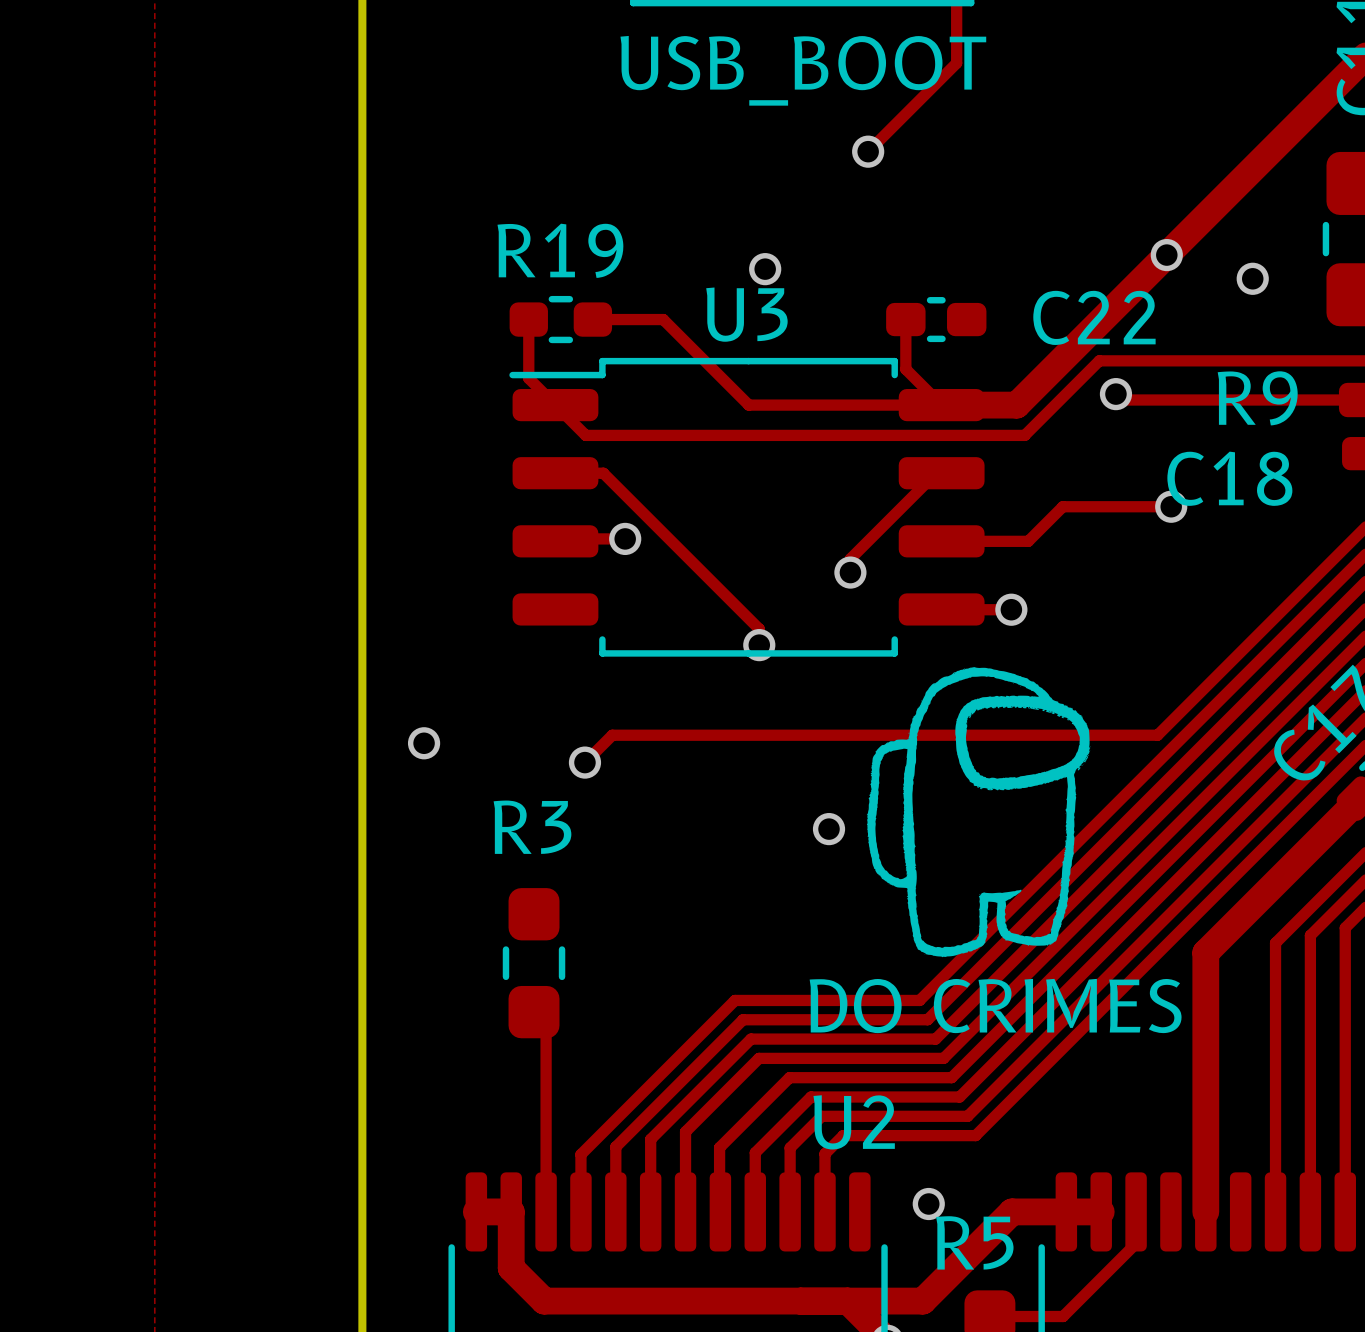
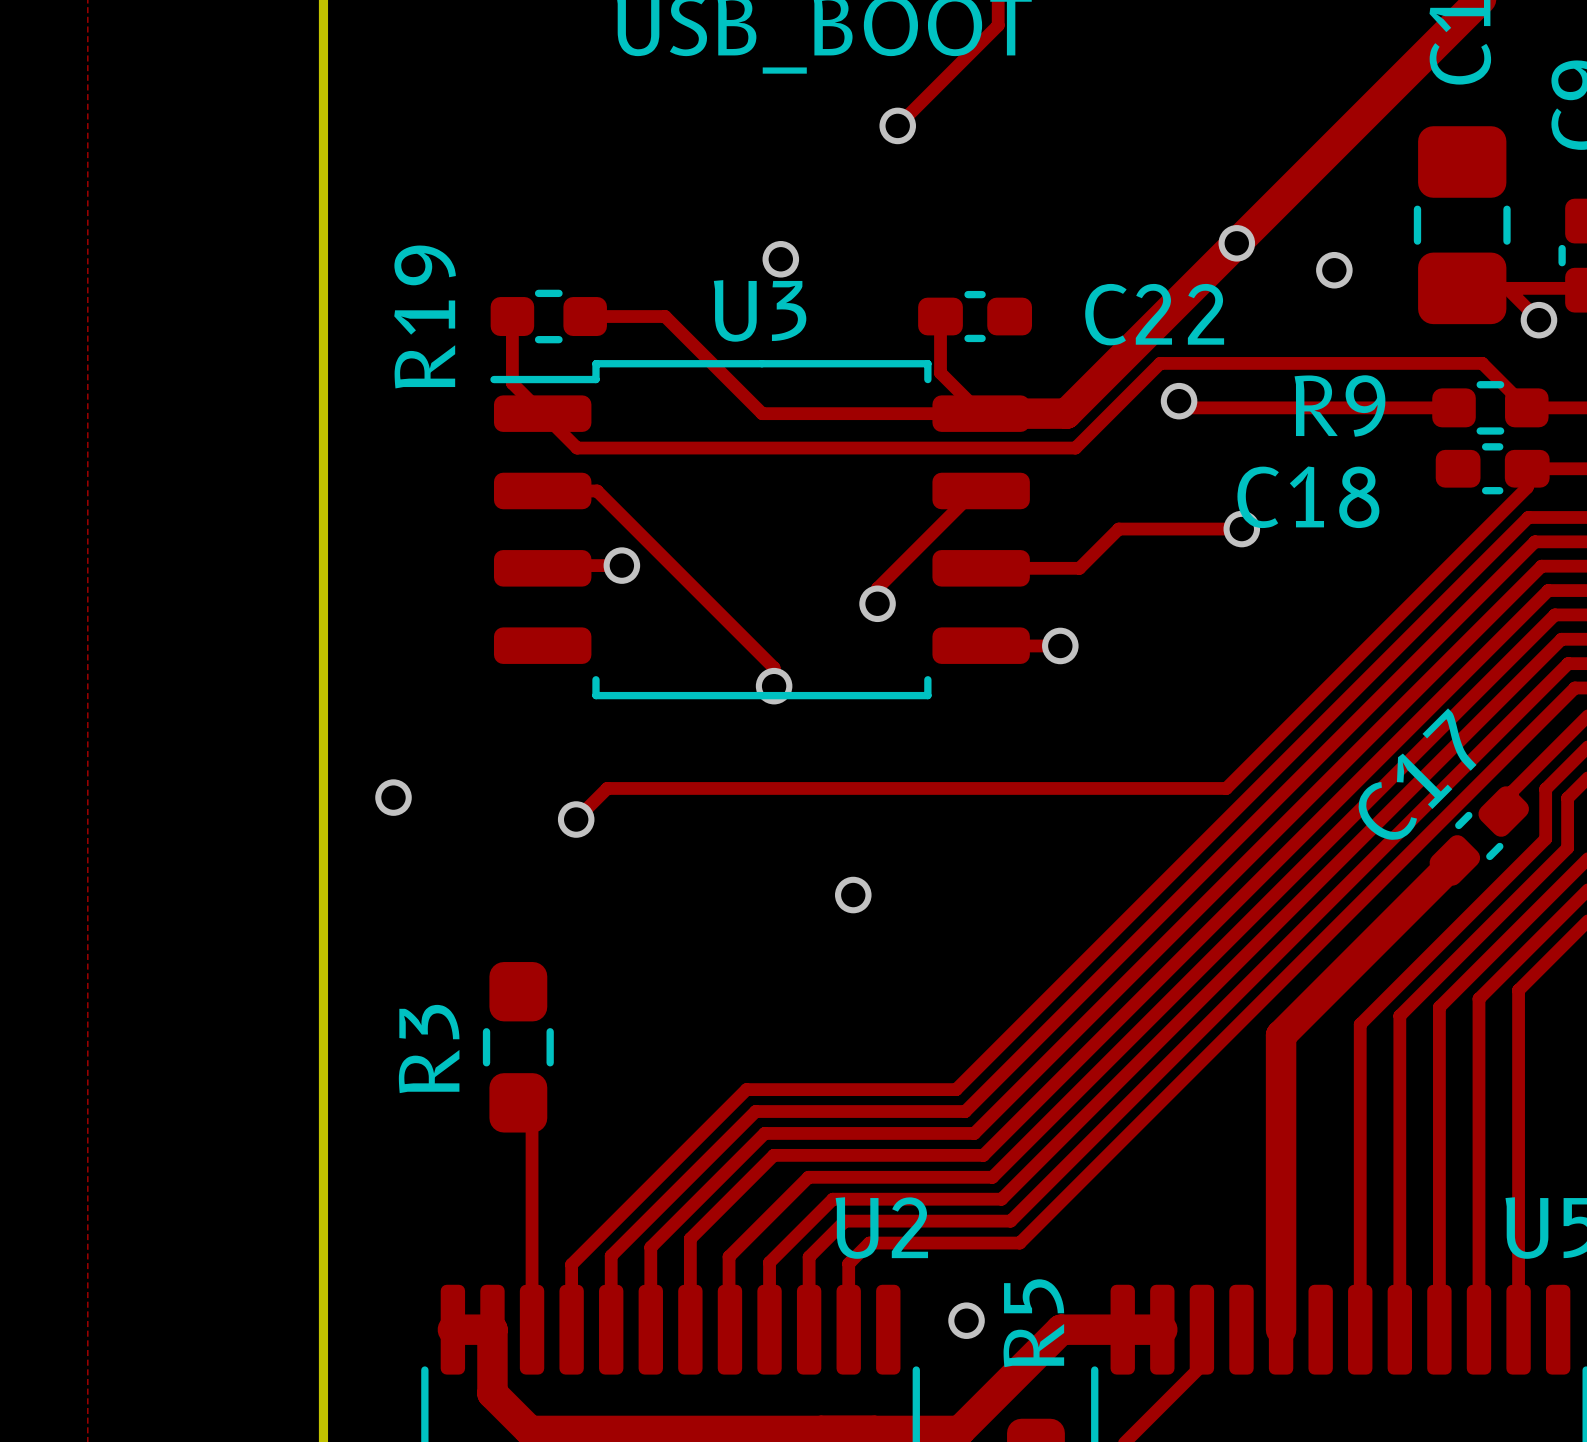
R19 name rotation: 0° (560, 250) -> 90° counterclockwise (425, 316)
drawing: [866, 667, 1091, 958] -> none
R3 name rotation: 0° (532, 827) -> 90° counterclockwise (429, 1049)
R3 name position: R3 (532, 827) -> R3 (429, 1049)
text: DO CRIMES (995, 1005) -> none
R5 name rotation: 0° (974, 1242) -> 90° counterclockwise (1033, 1323)

